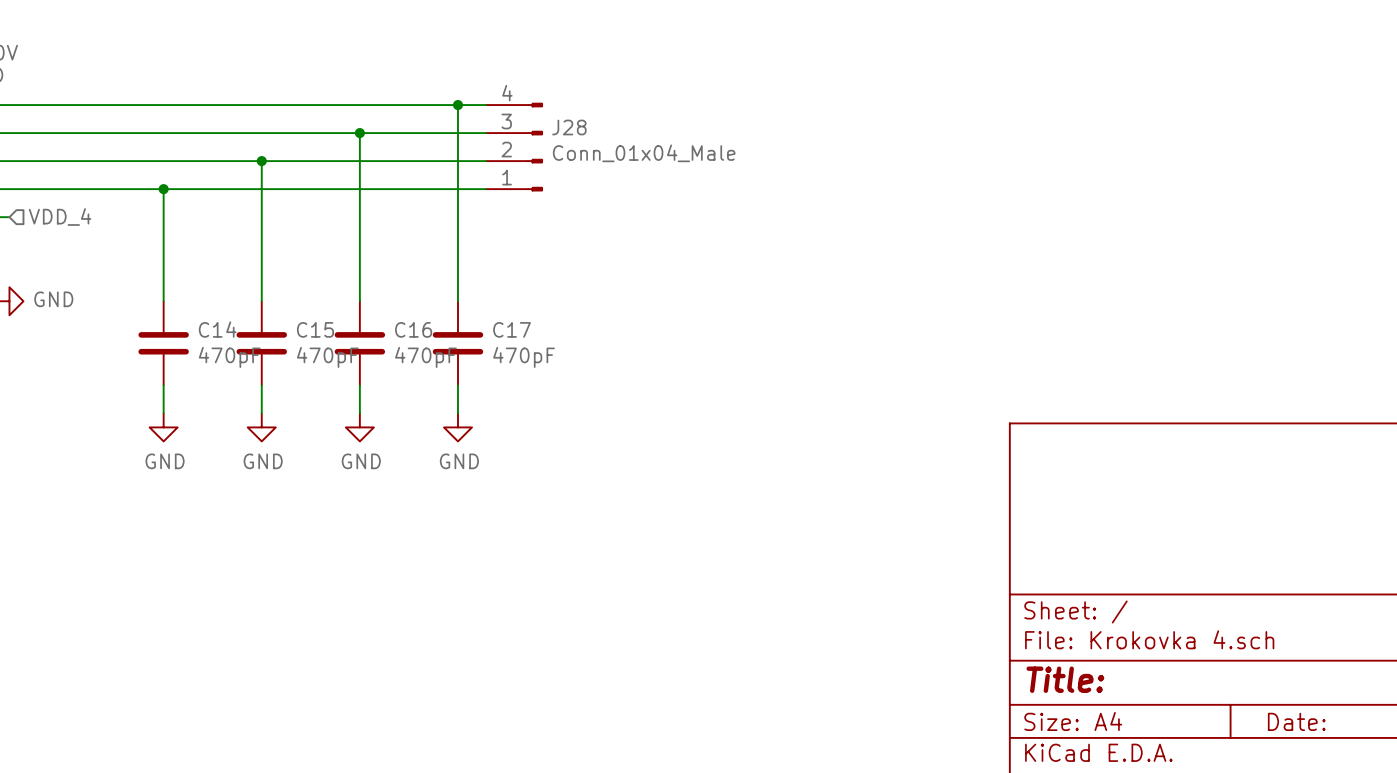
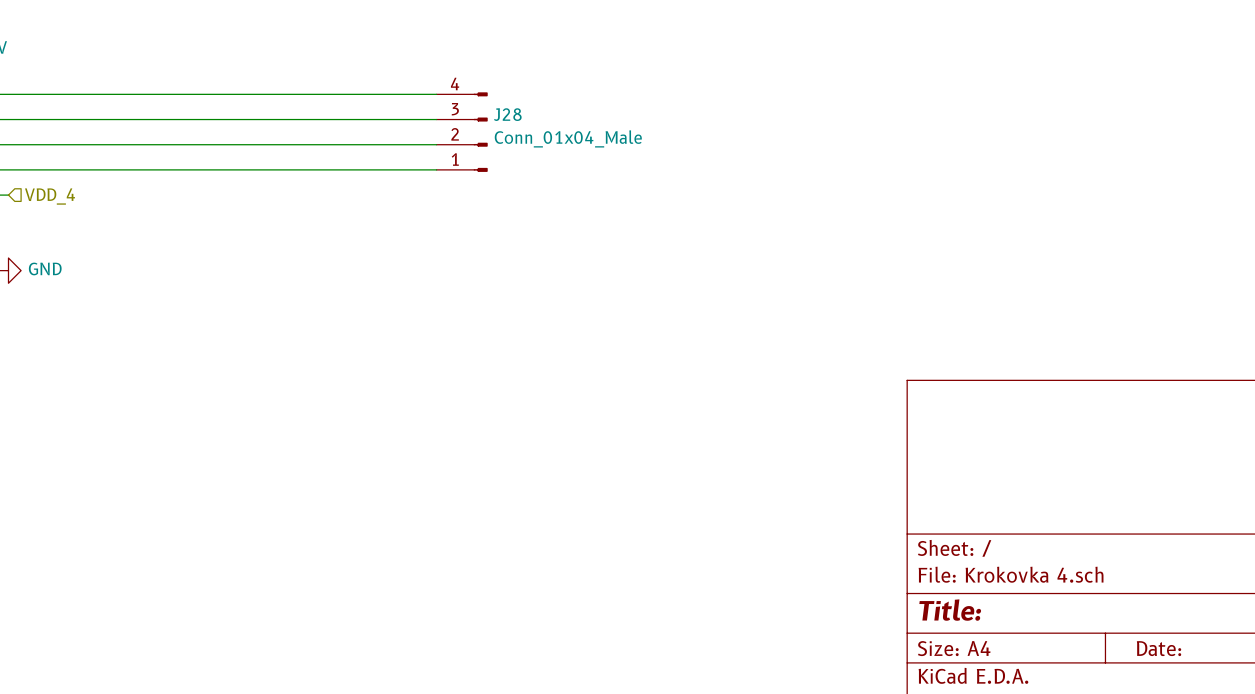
wire: (457, 105) (457, 301) -> none
junction: (457, 105) -> none
wire: (359, 133) (359, 301) -> none
junction: (359, 133) -> none
wire: (261, 161) (261, 301) -> none
junction: (261, 161) -> none
wire: (163, 189) (163, 301) -> none
junction: (163, 189) -> none
C14: 470pF (163, 343) -> none
C15: 470pF (261, 343) -> none
C16: 470pF (359, 343) -> none
C17: 470pF (457, 343) -> none
wire: (163, 385) (163, 413) -> none
wire: (261, 385) (261, 413) -> none
wire: (359, 385) (359, 413) -> none
wire: (457, 385) (457, 413) -> none
power symbol: GND (163, 427) -> none
power symbol: GND (261, 427) -> none
power symbol: GND (359, 427) -> none
power symbol: GND (457, 427) -> none

